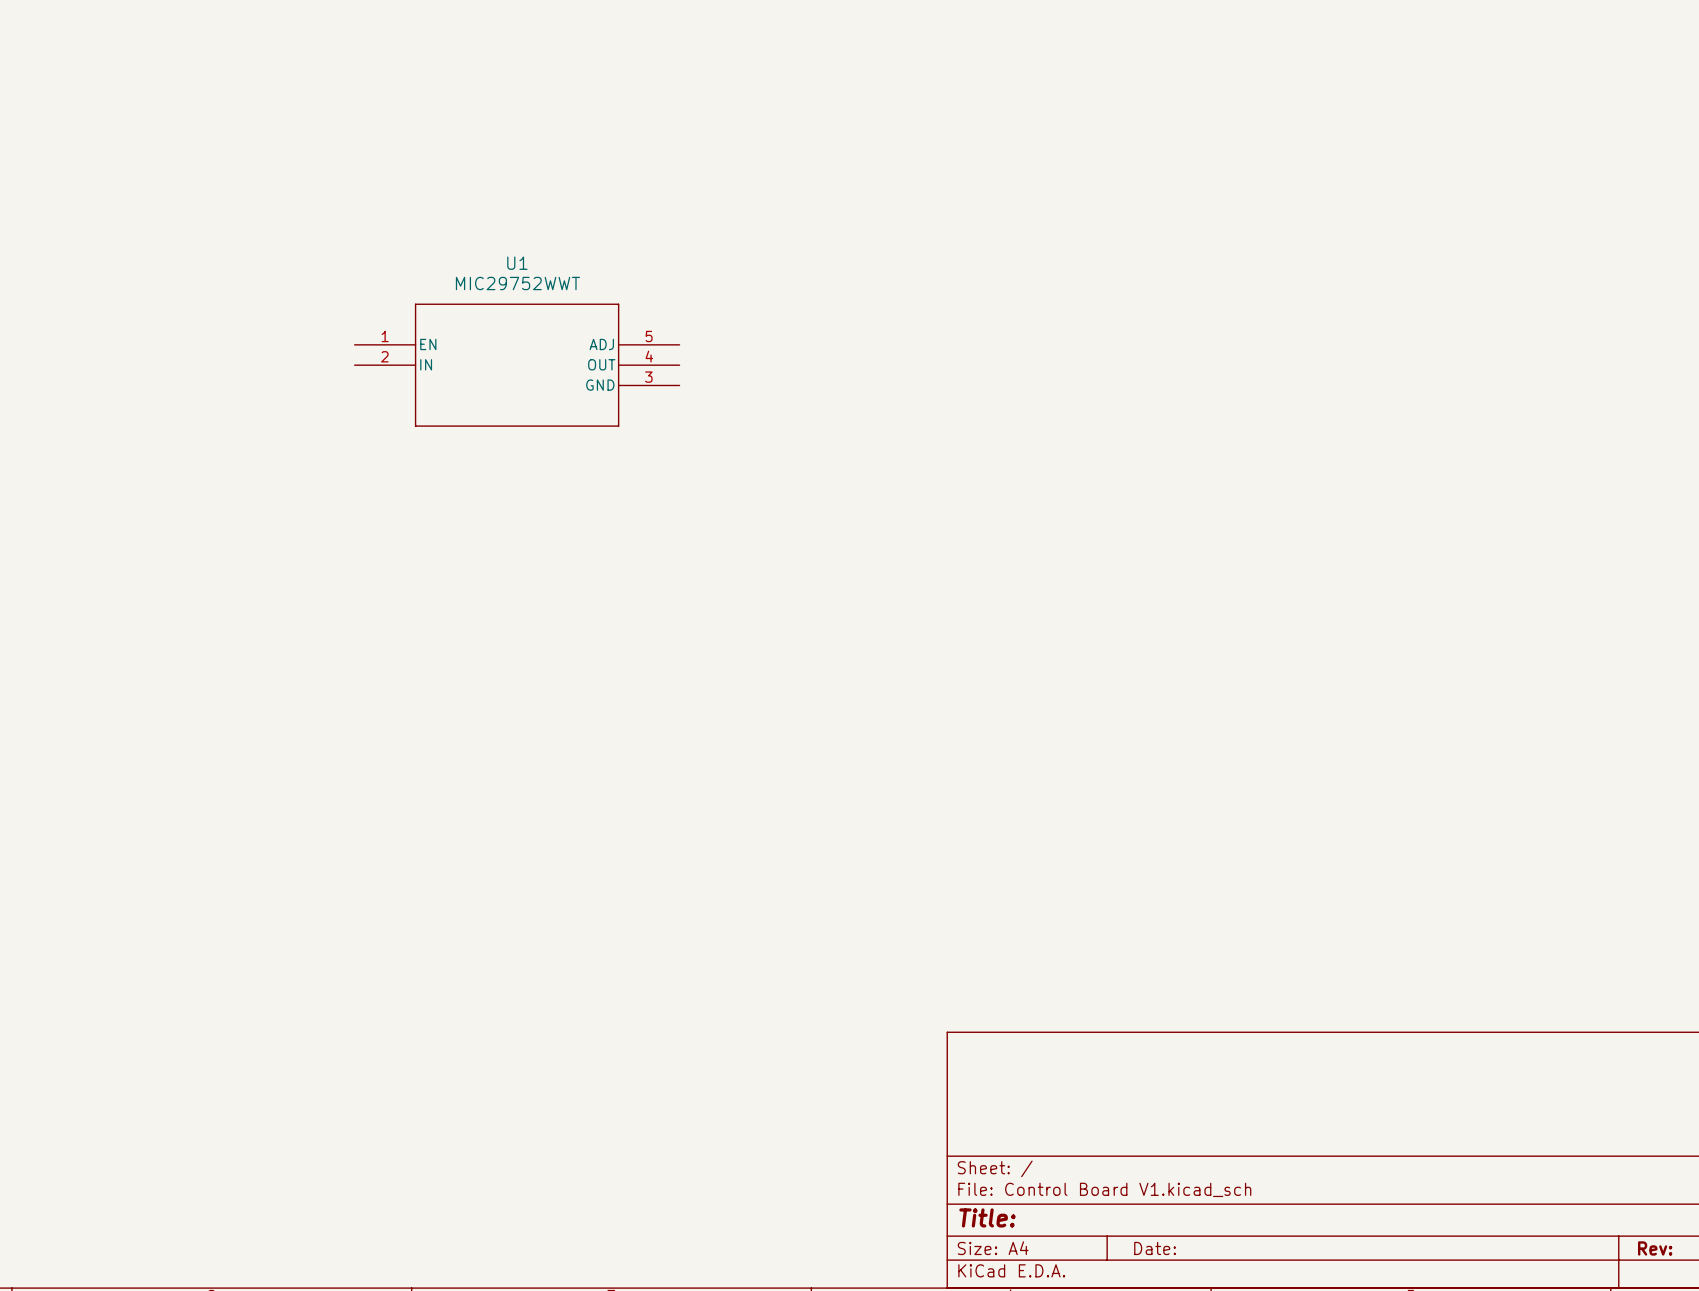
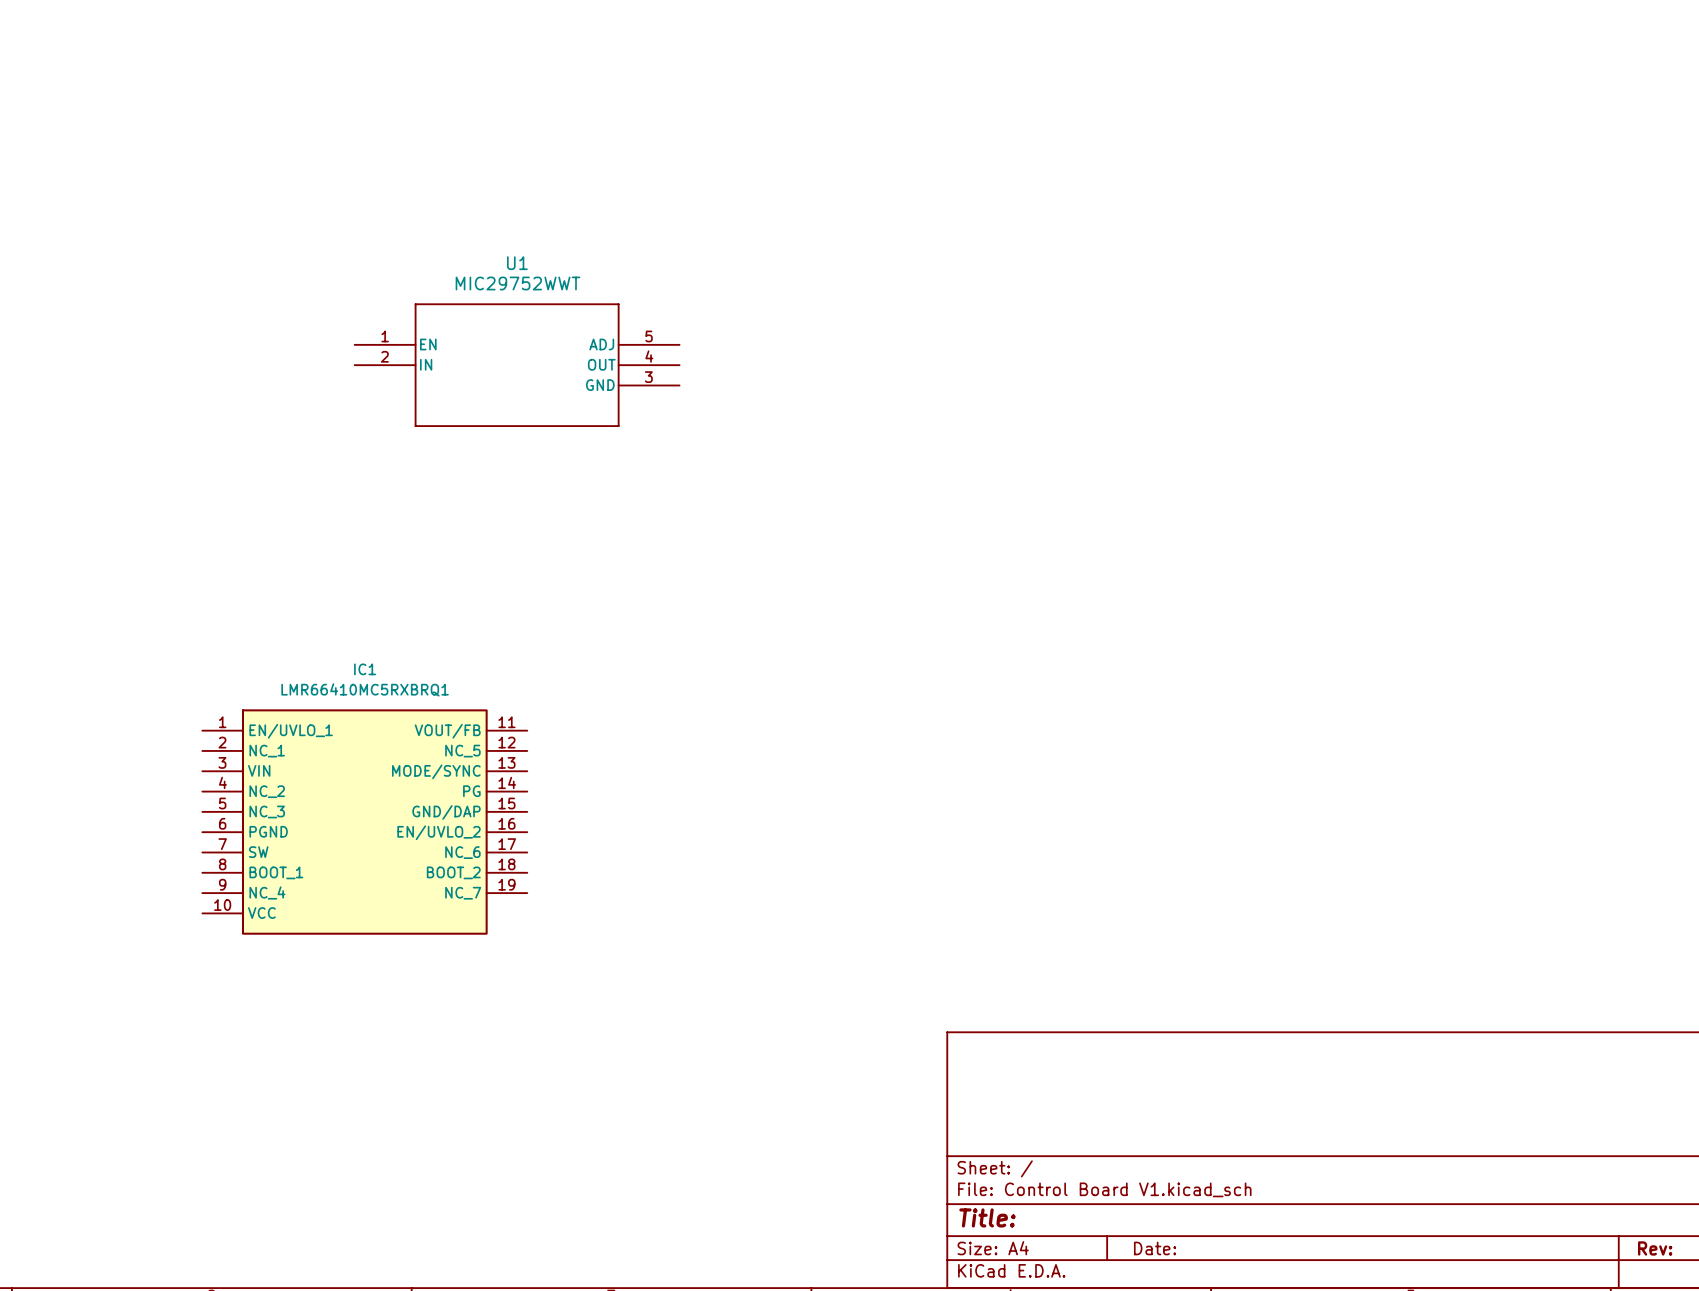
IC1: none -> LMR66410MC5RXBRQ1 (364, 822)

